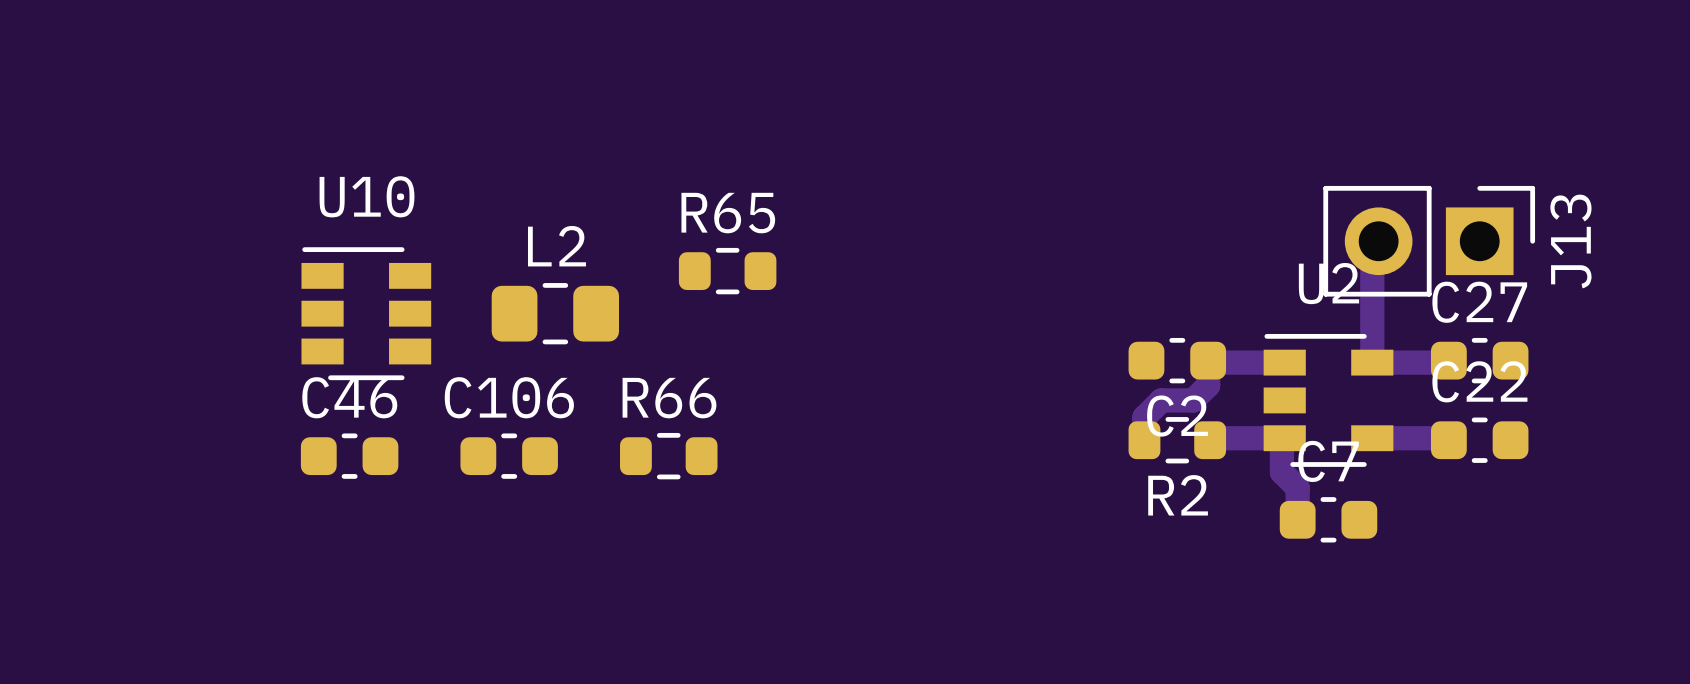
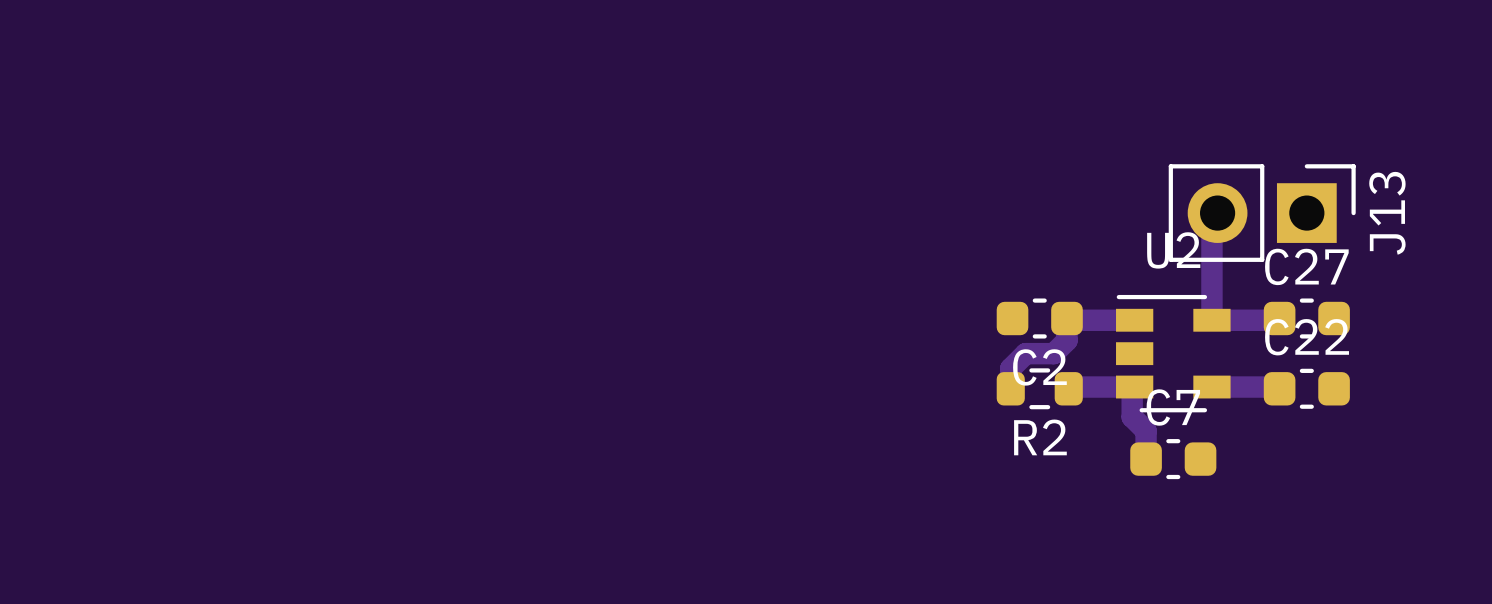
R65: (727, 271) -> none
U10: (366, 313) -> none
L2: (555, 313) -> none
C46: (349, 456) -> none
C106: (509, 456) -> none
R66: (668, 456) -> none

